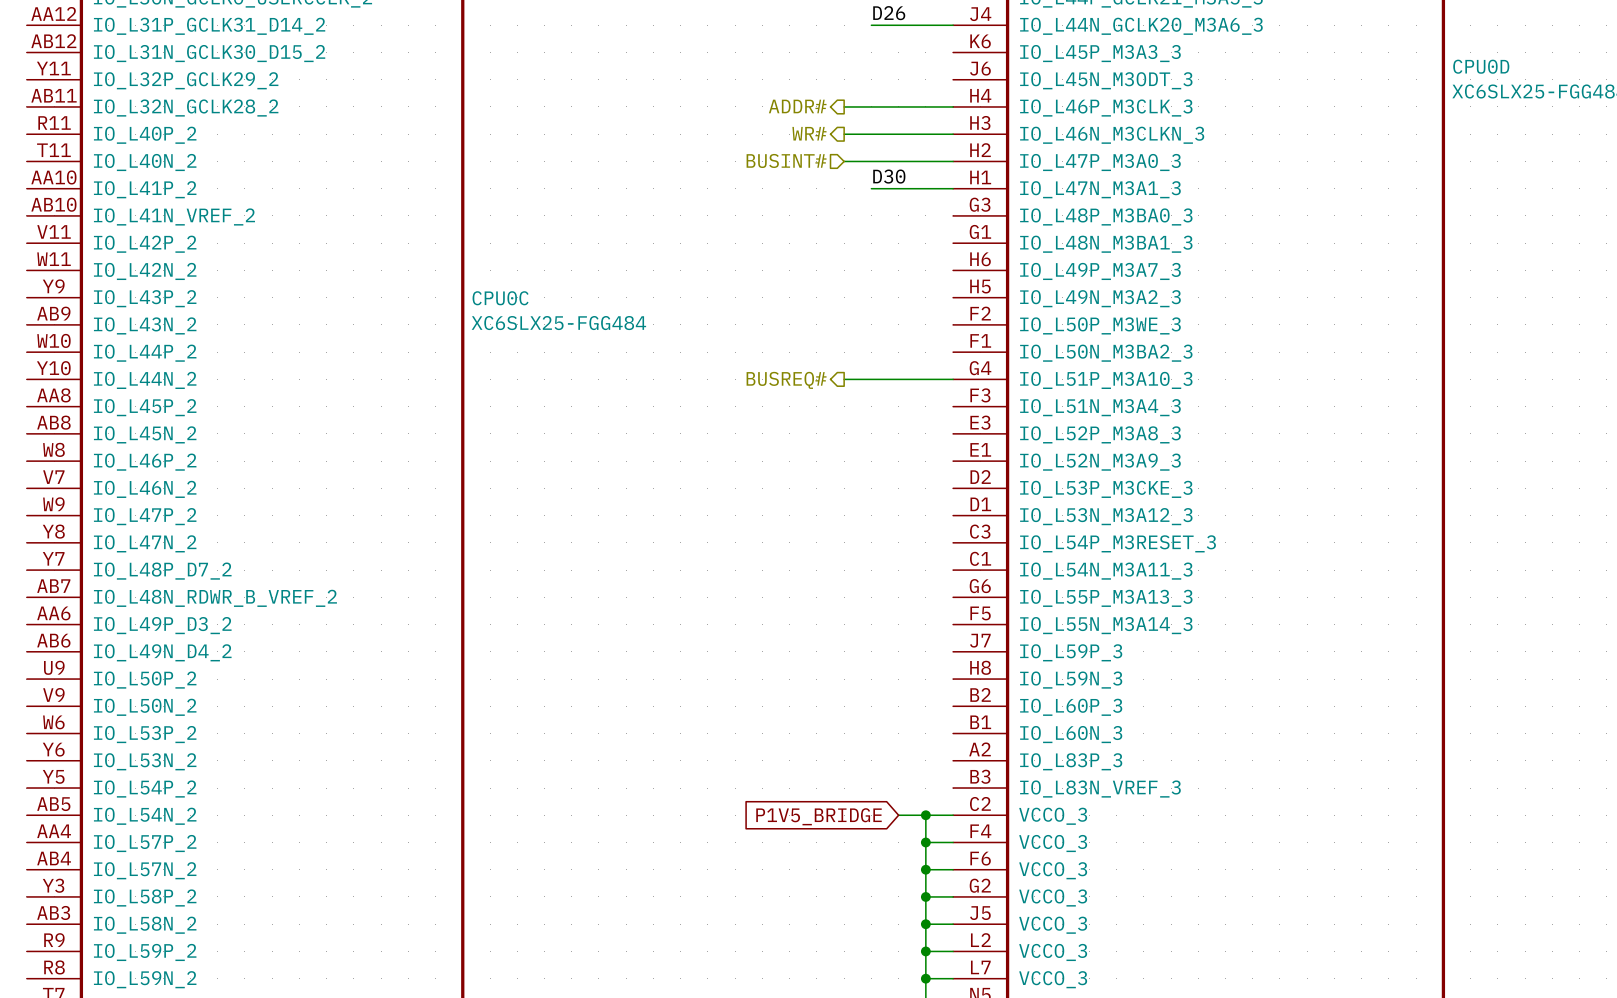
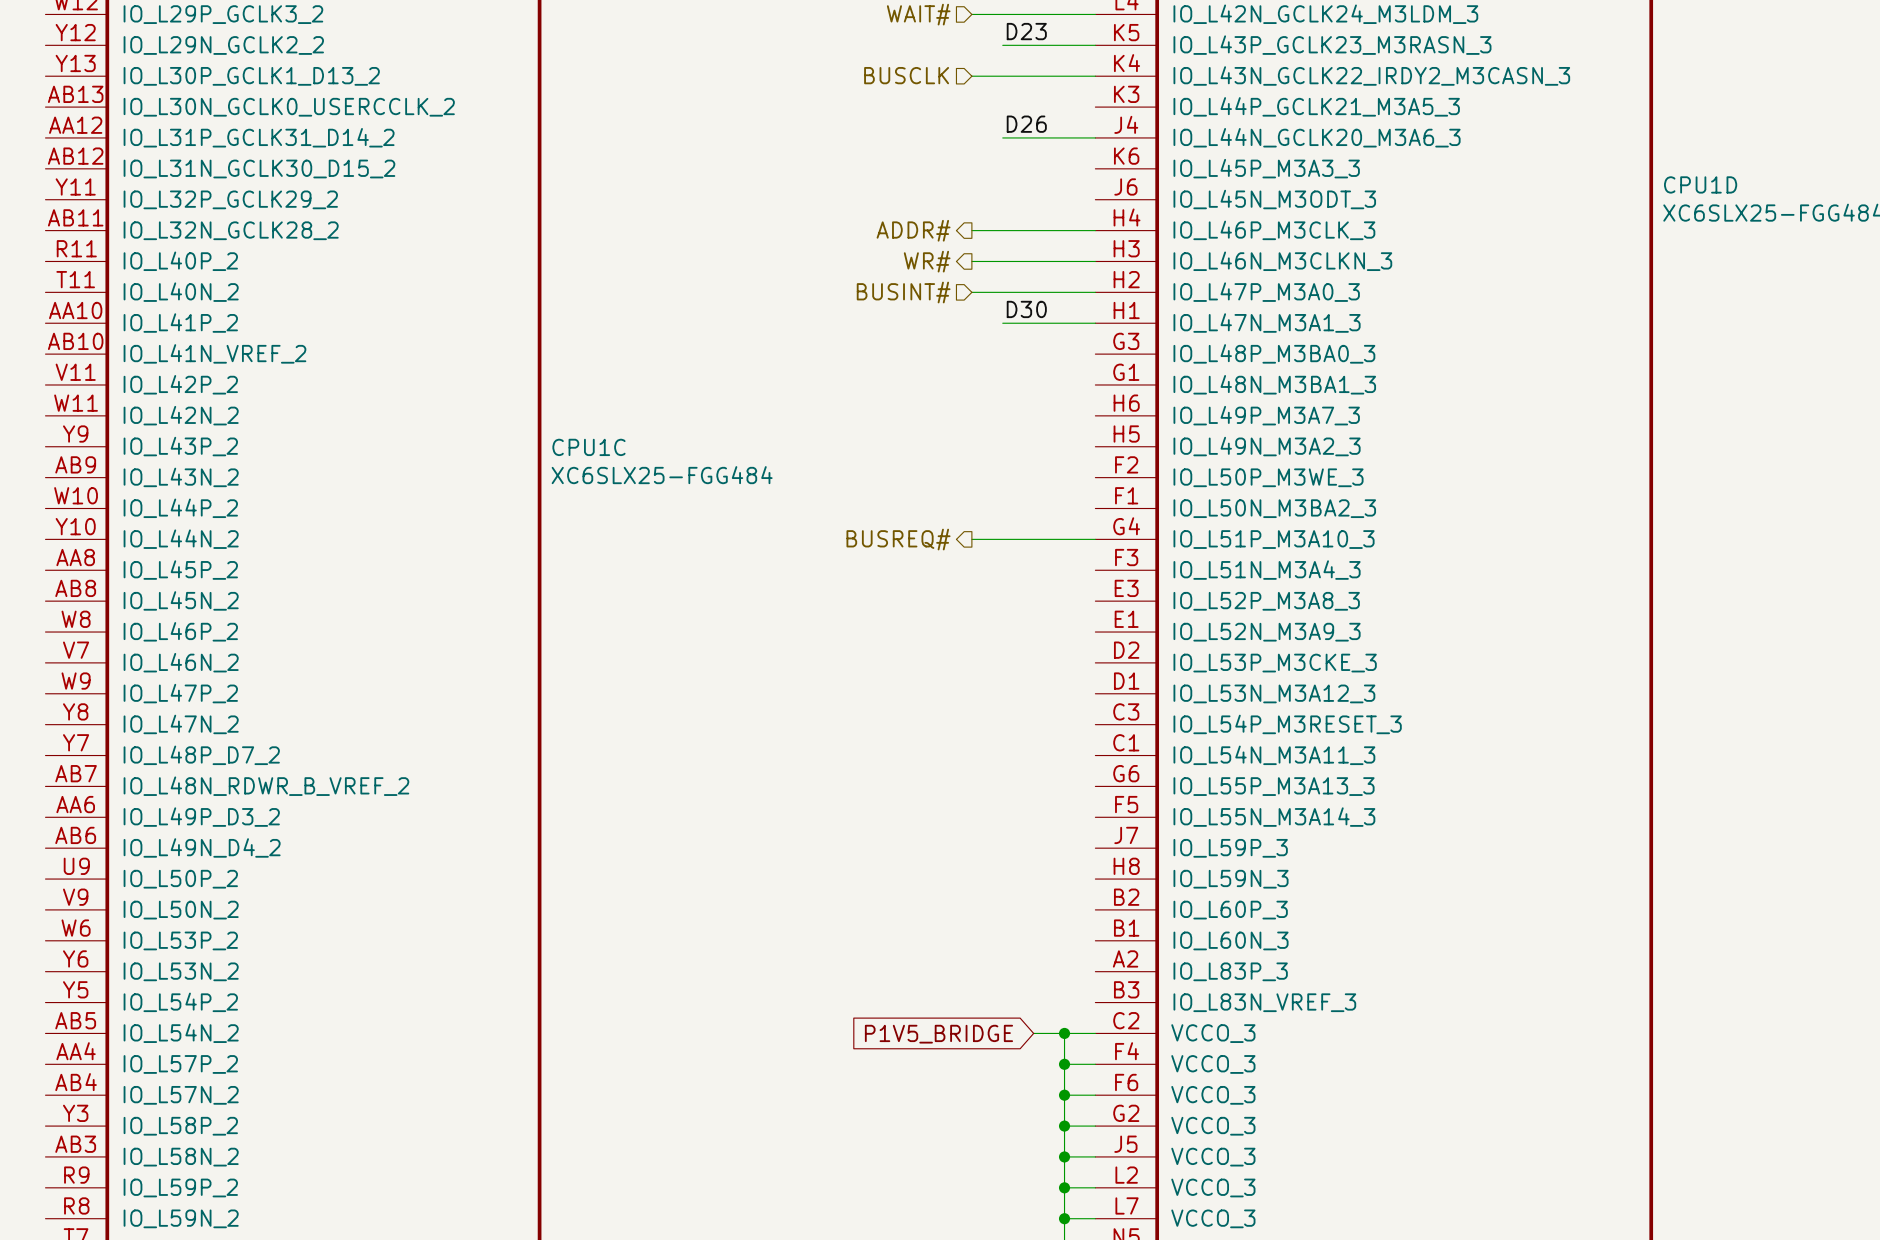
CPU0D name: CPU0D (1481, 66) -> CPU1D (1700, 184)
CPU0C name: CPU0C (500, 298) -> CPU1C (588, 447)

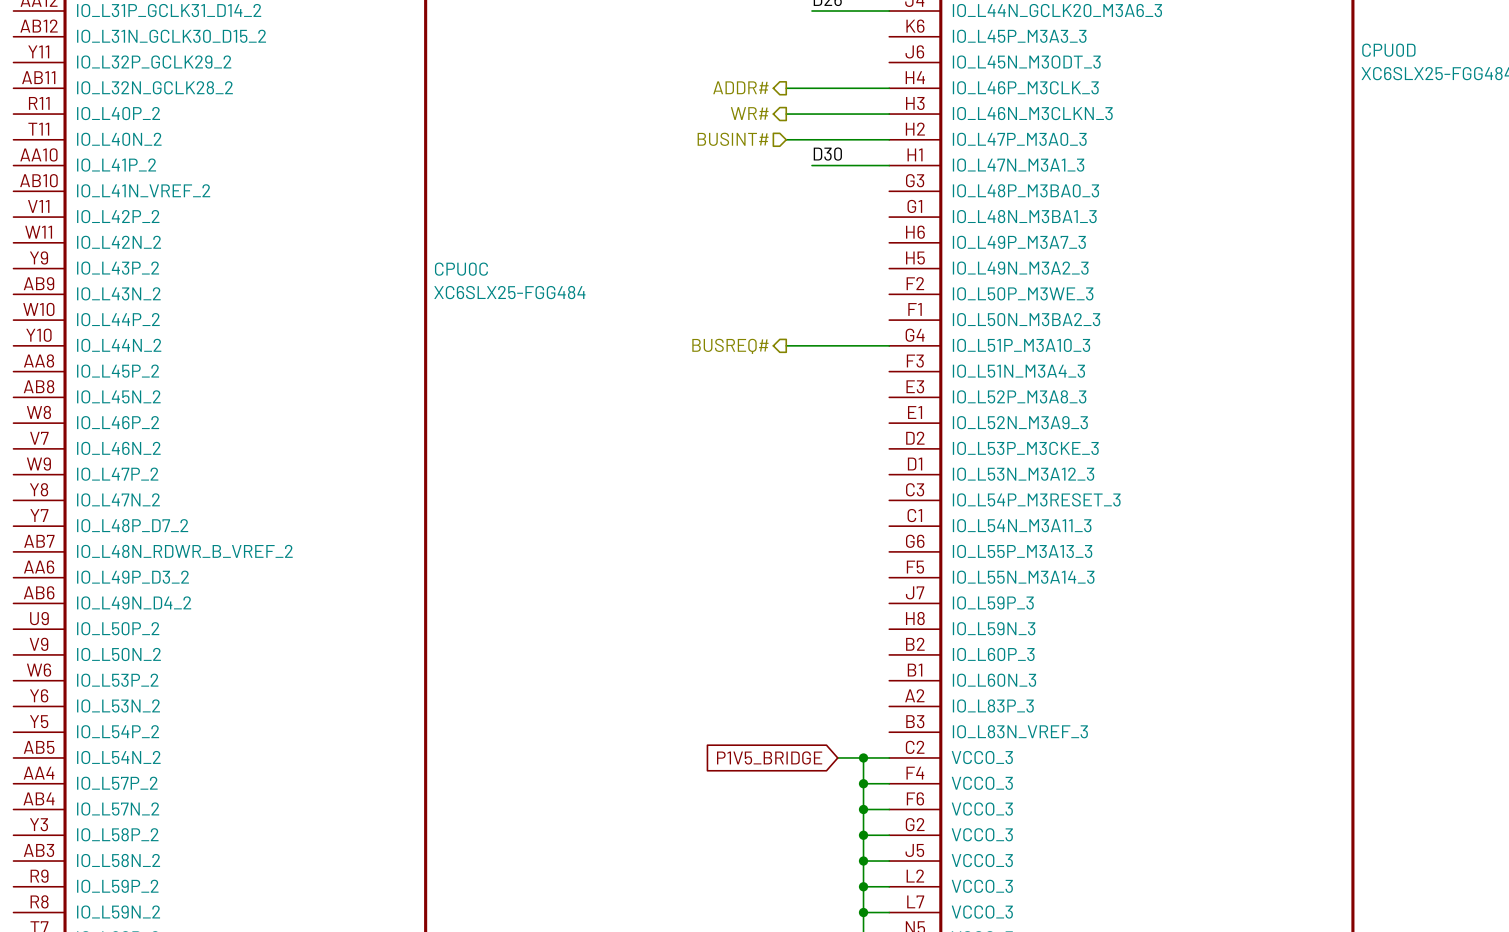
CPU1D name: CPU1D (1700, 184) -> CPU0D (1388, 50)
CPU1C name: CPU1C (588, 447) -> CPU0C (461, 269)

